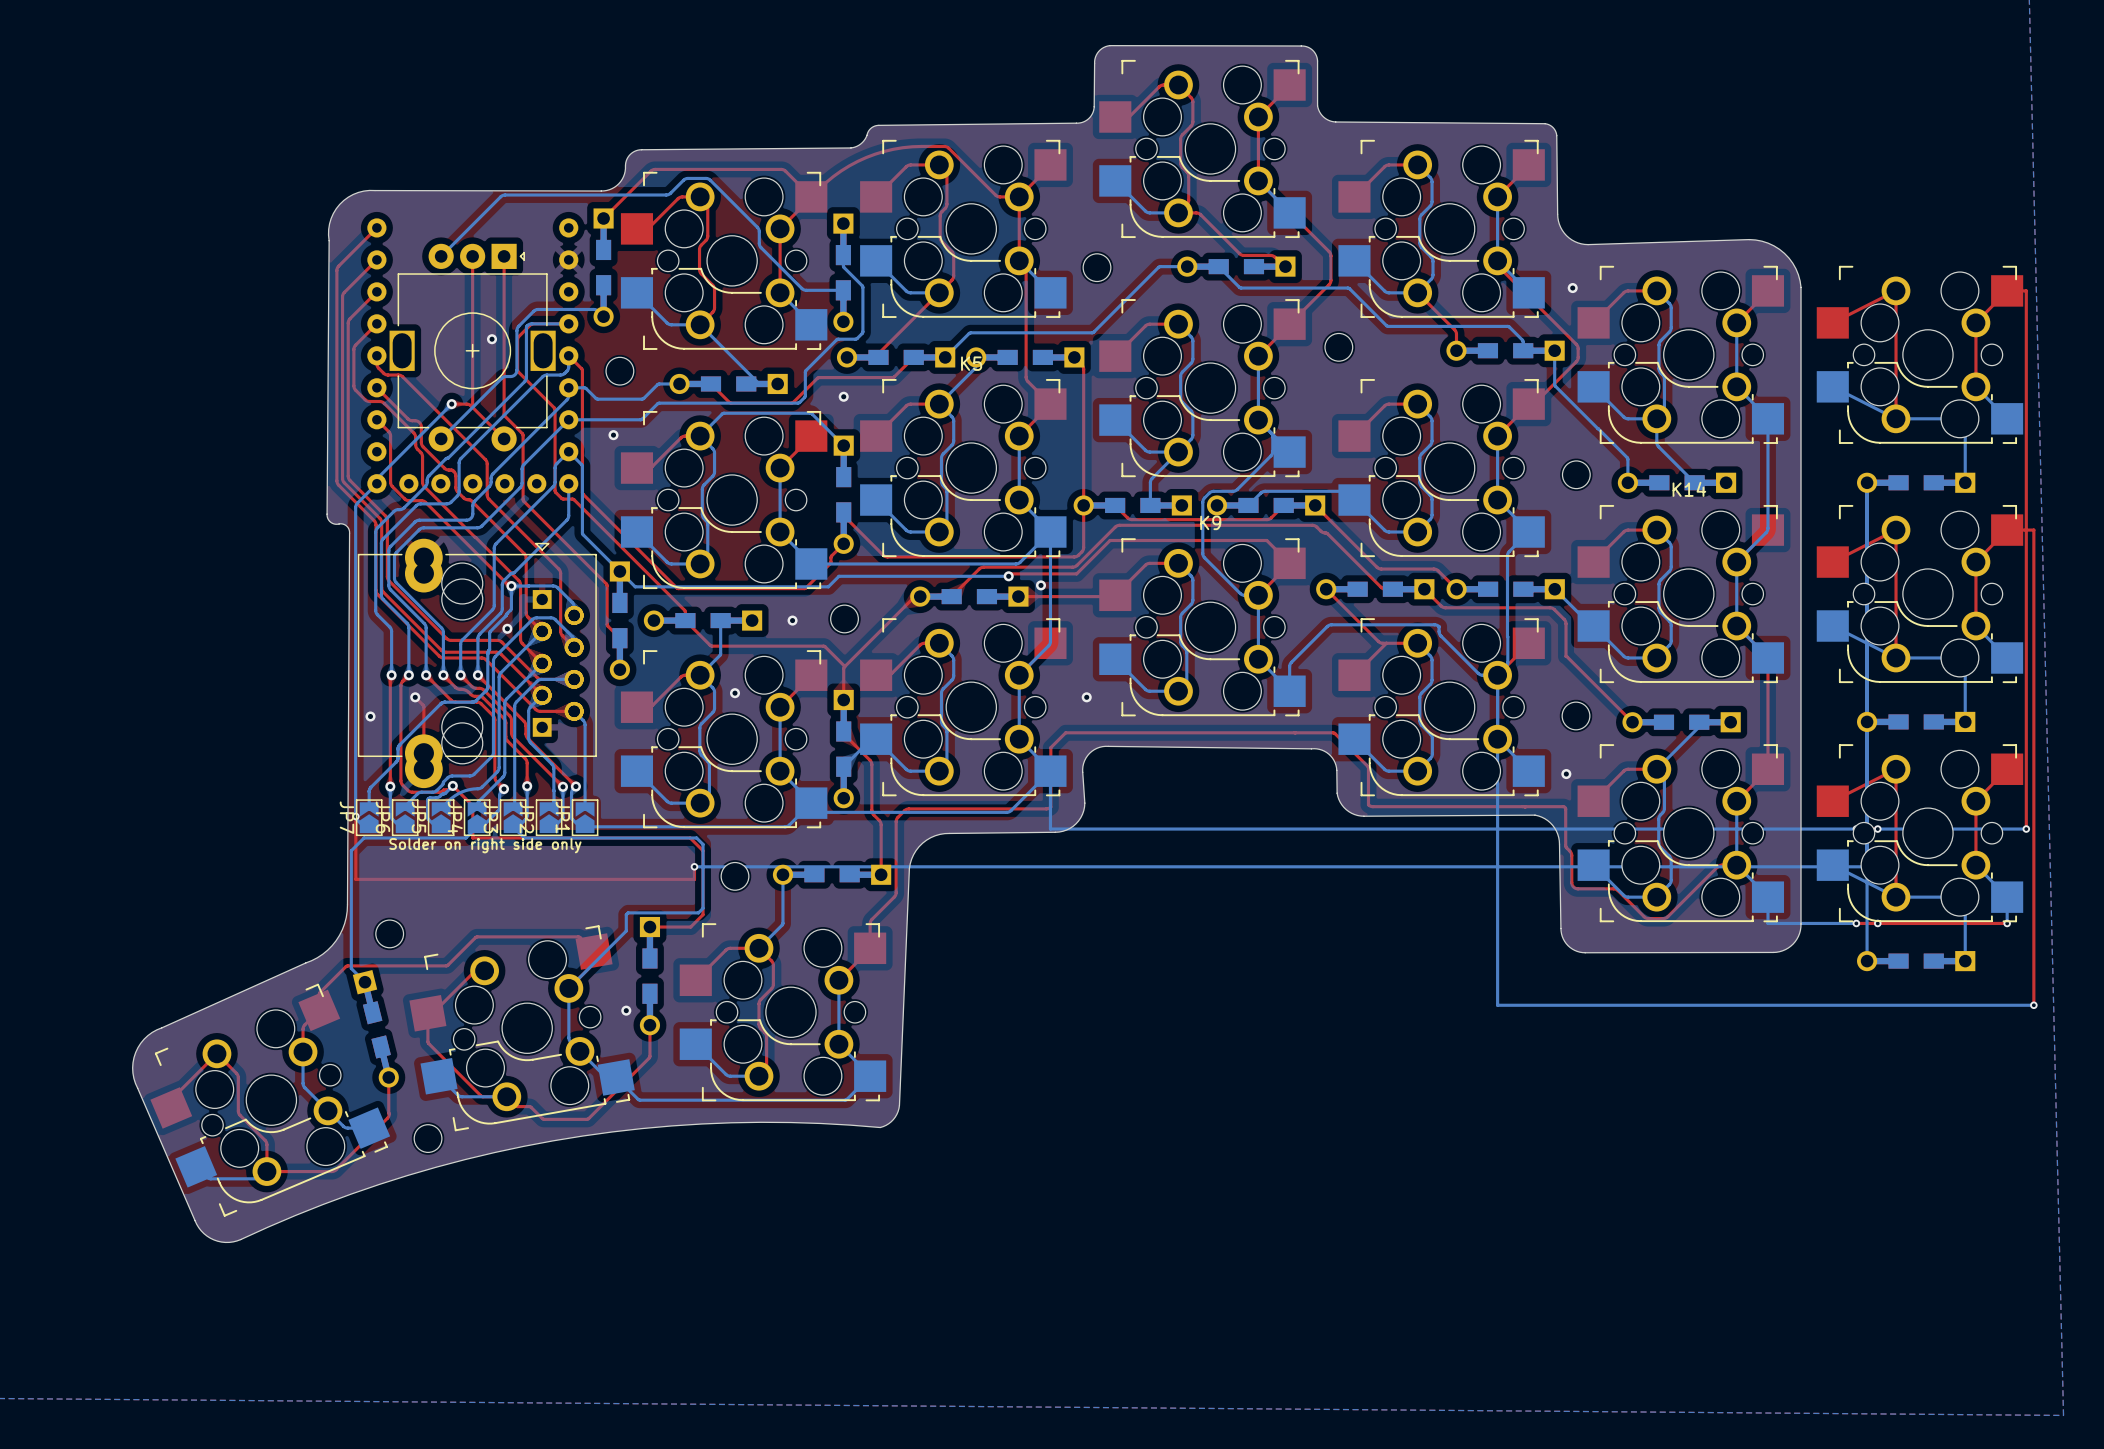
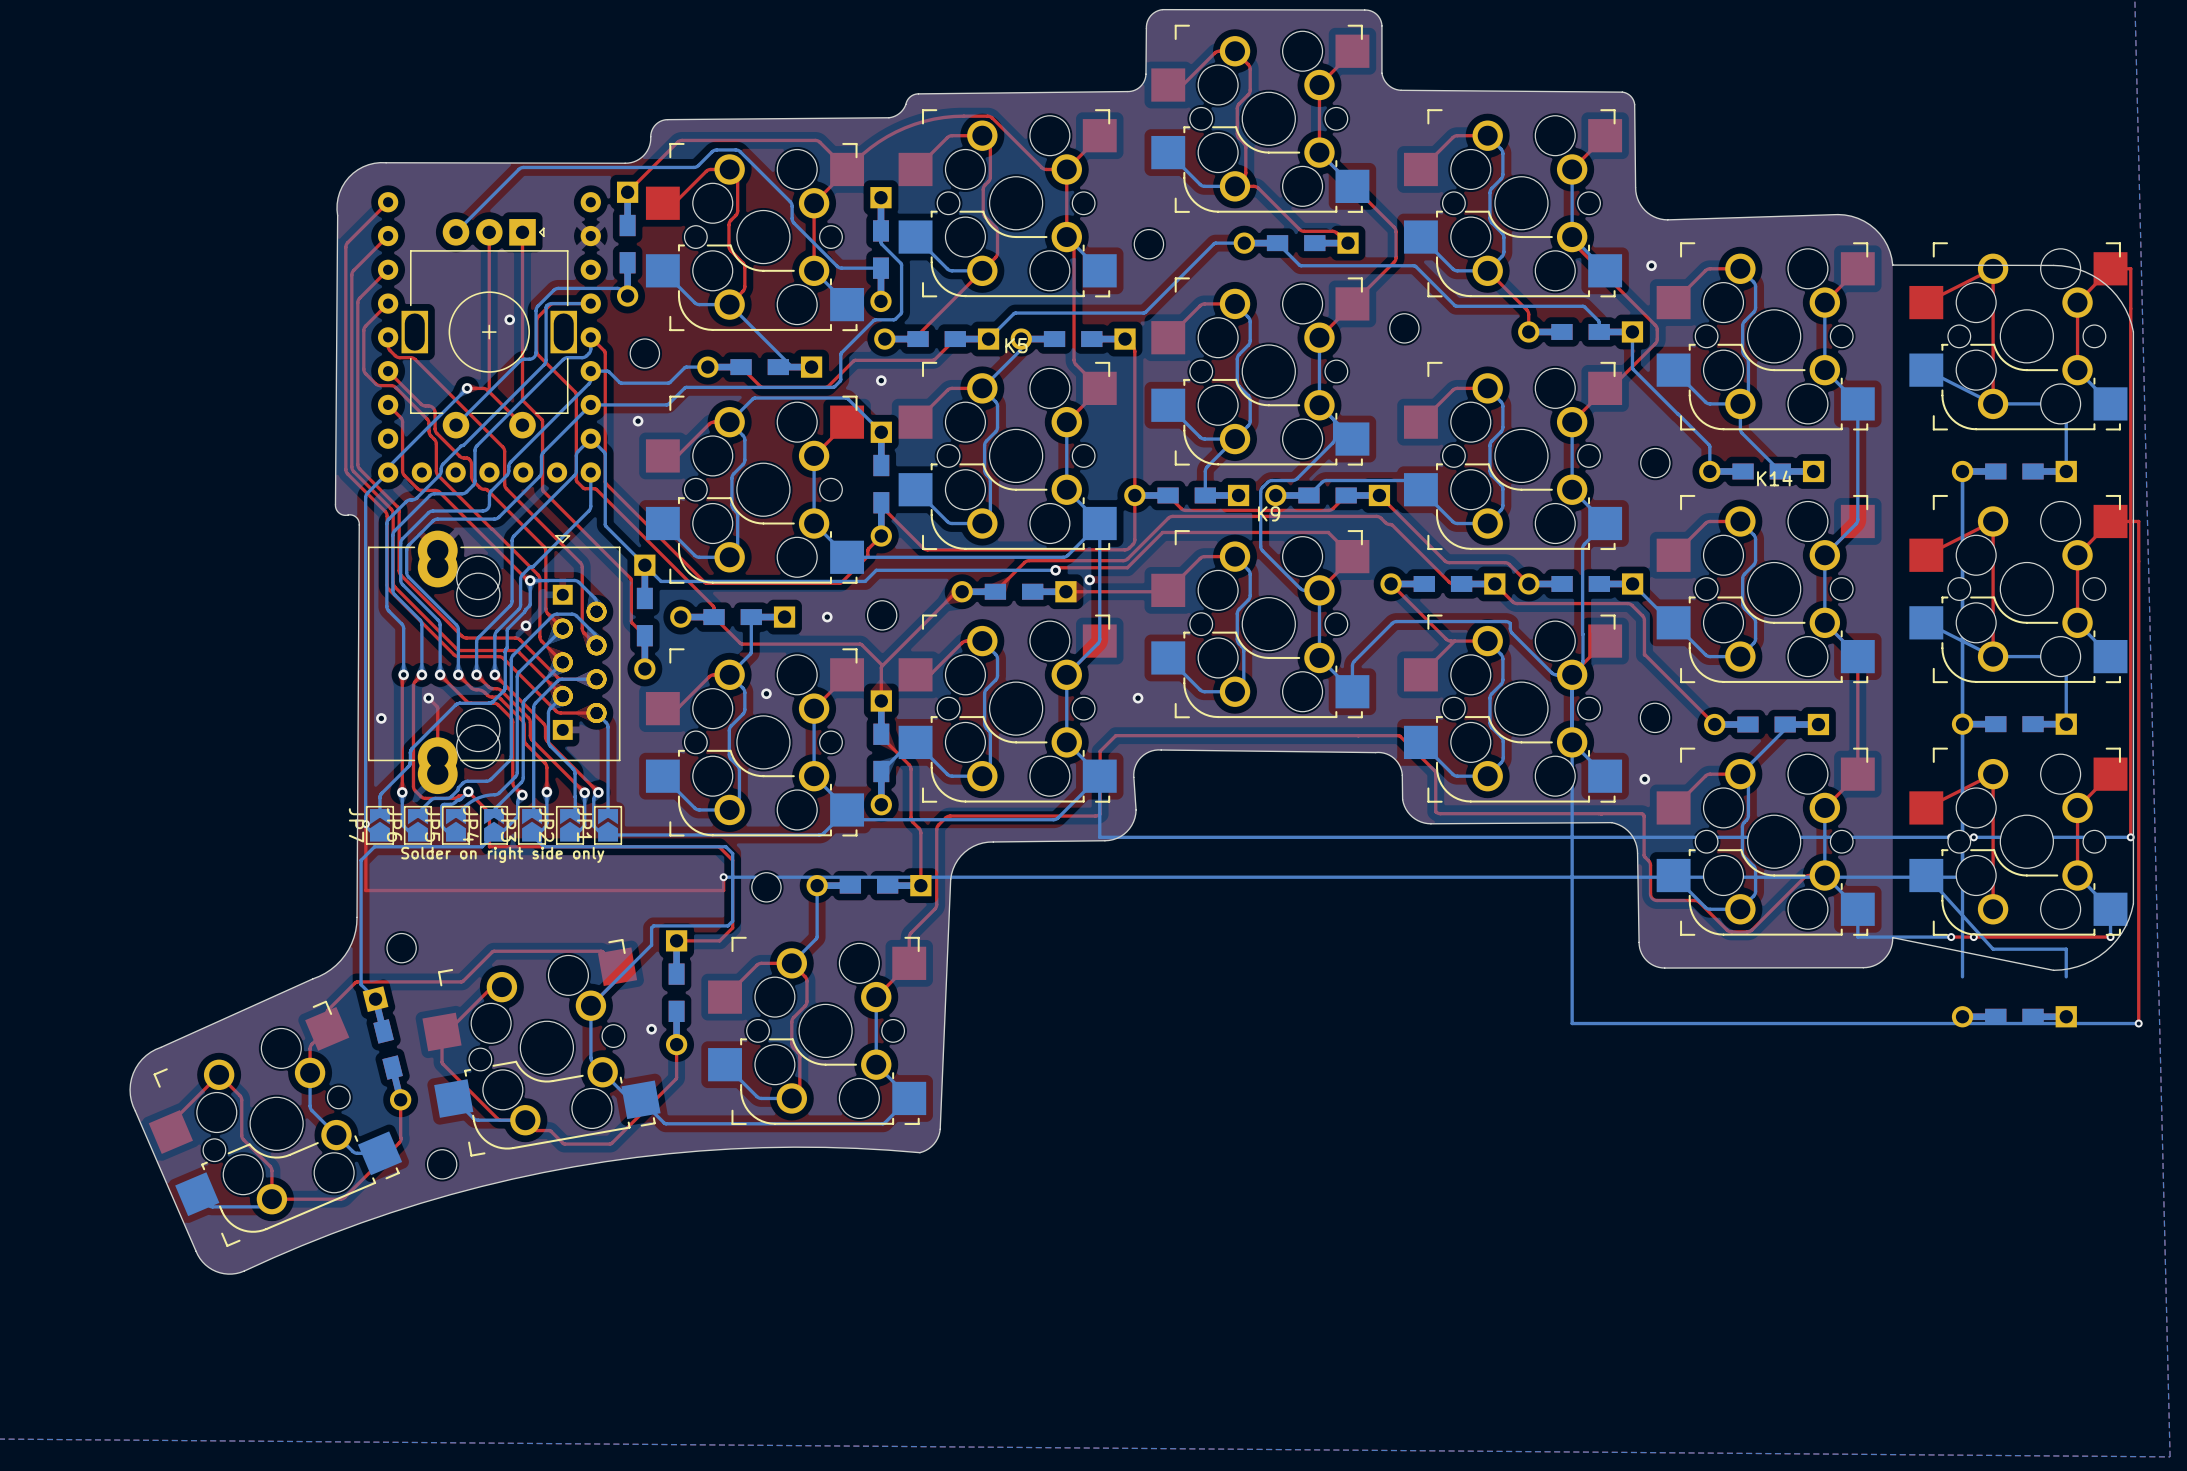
board edge: (1801, 287) (1801, 923) -> (1892, 265) (2069, 267) (2092, 275) (2105, 284) (2121, 302) (2128, 316) (2133, 331) (2133, 903) (2125, 926) (2116, 940) (2105, 951) (2084, 963) (2061, 969) (2053, 970) (1892, 937)
bottom track: (1832, 865) (1896, 897) (1965, 897) (1965, 934) -> (1926, 875) (1993, 949) (2066, 949)
part position: (1916, 961) -> (2014, 1016)

